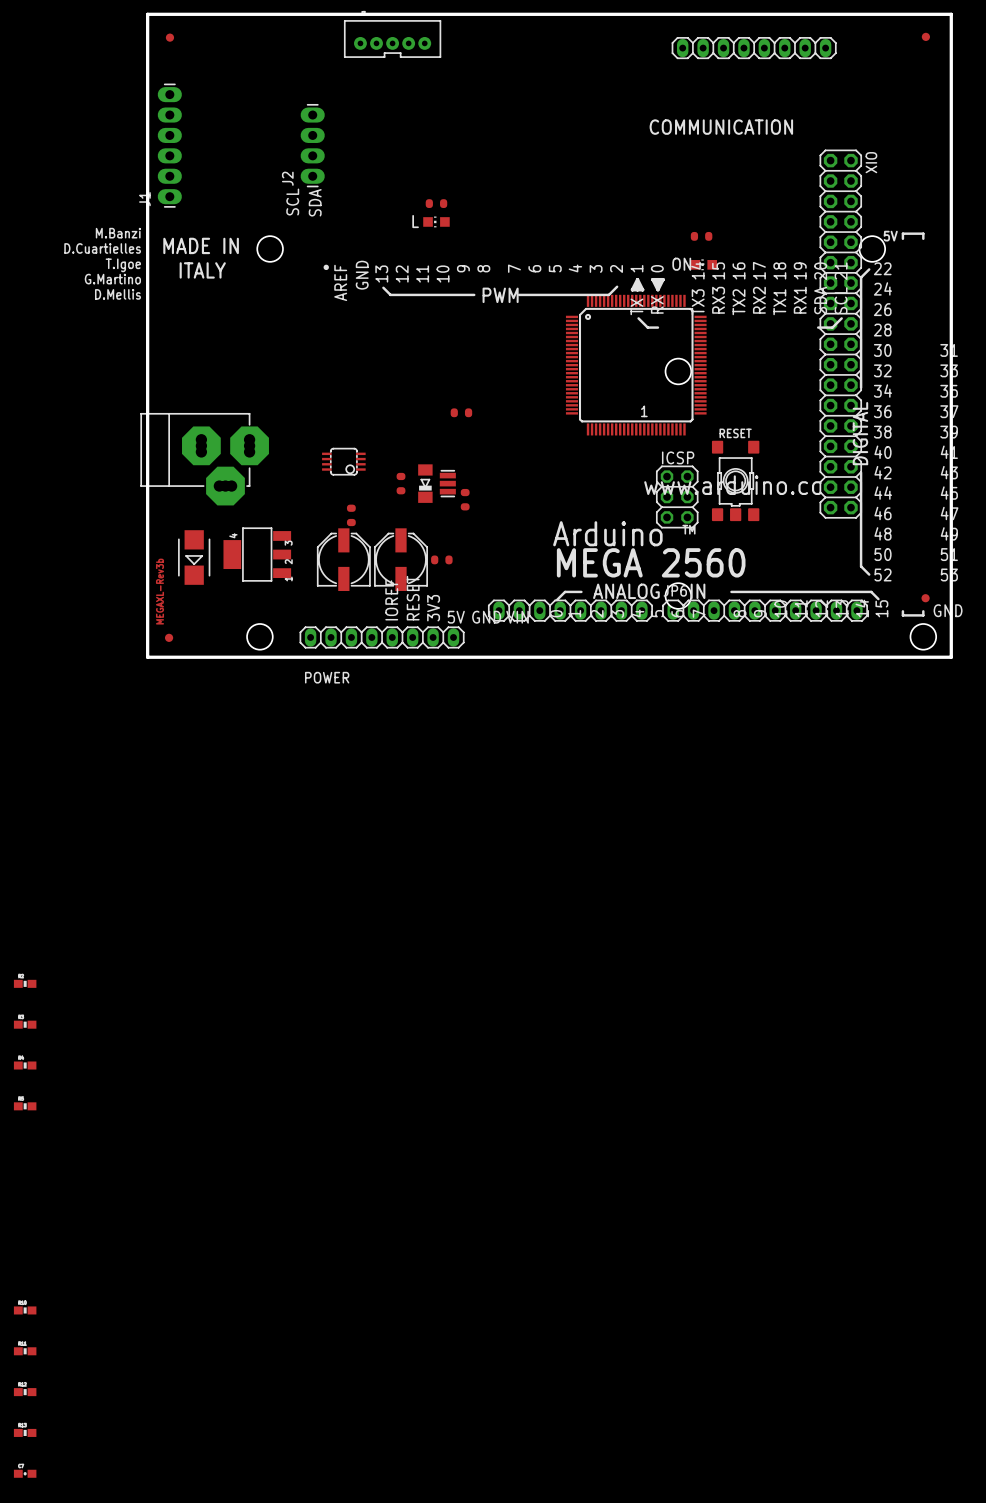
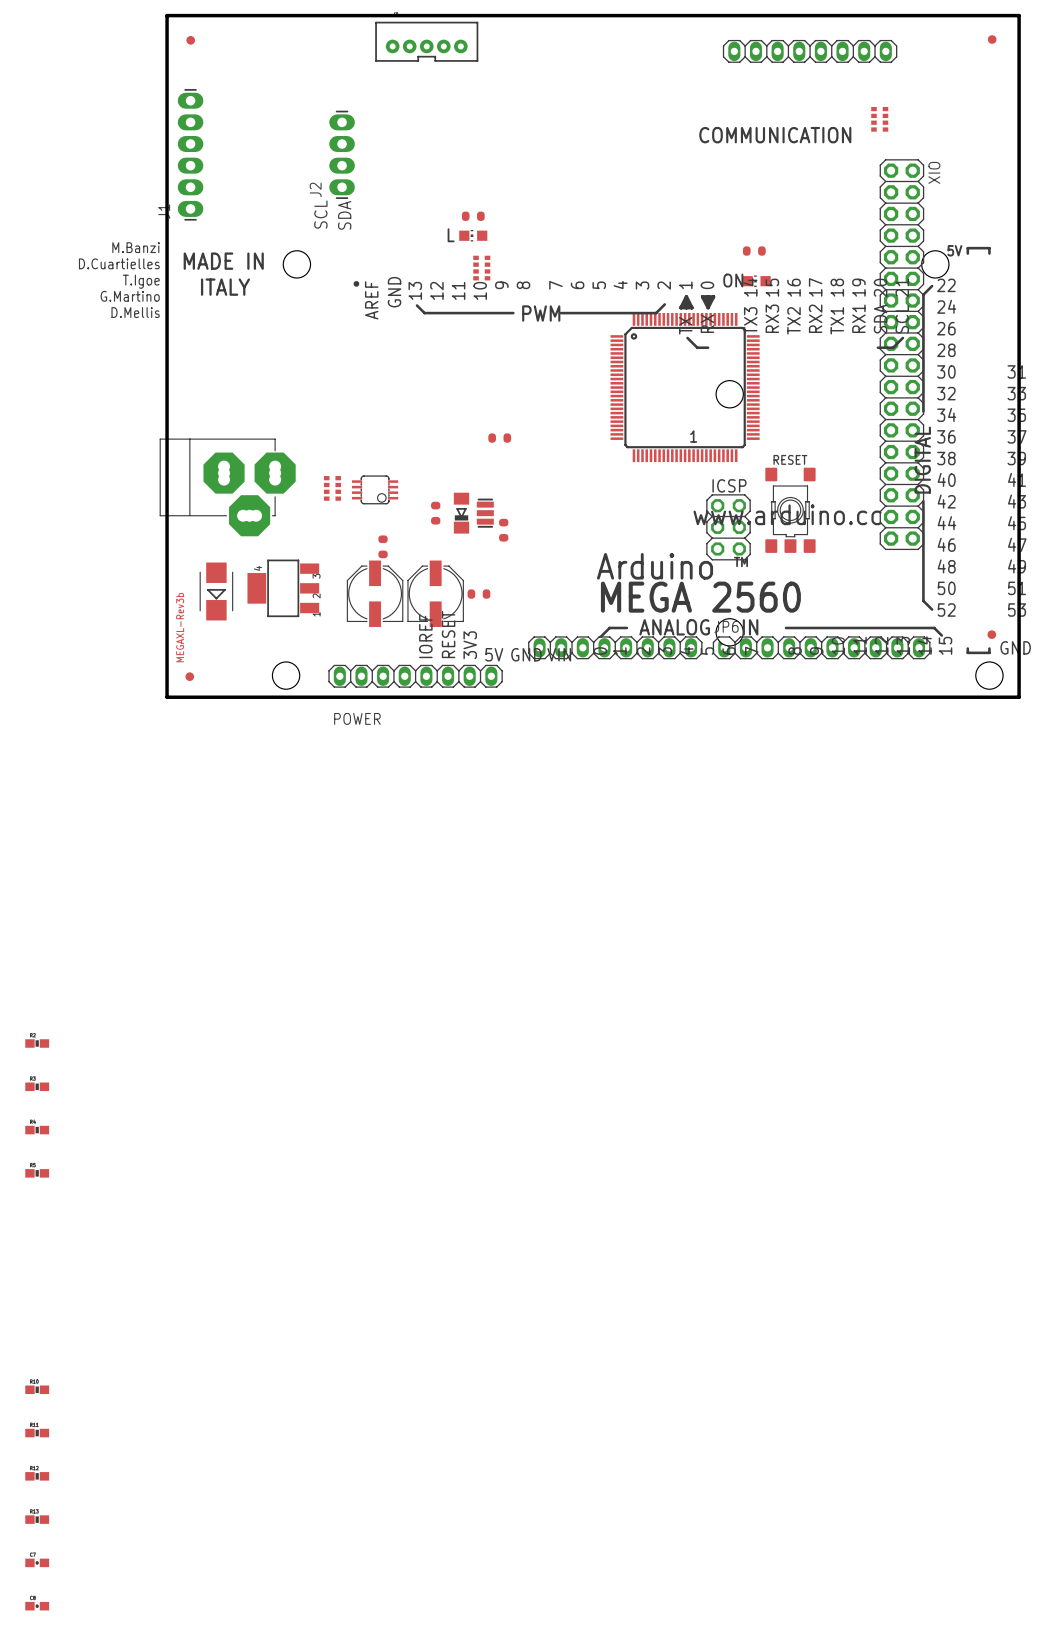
part: none -> (879, 119)
part: none -> (481, 268)
part: none -> (332, 488)

